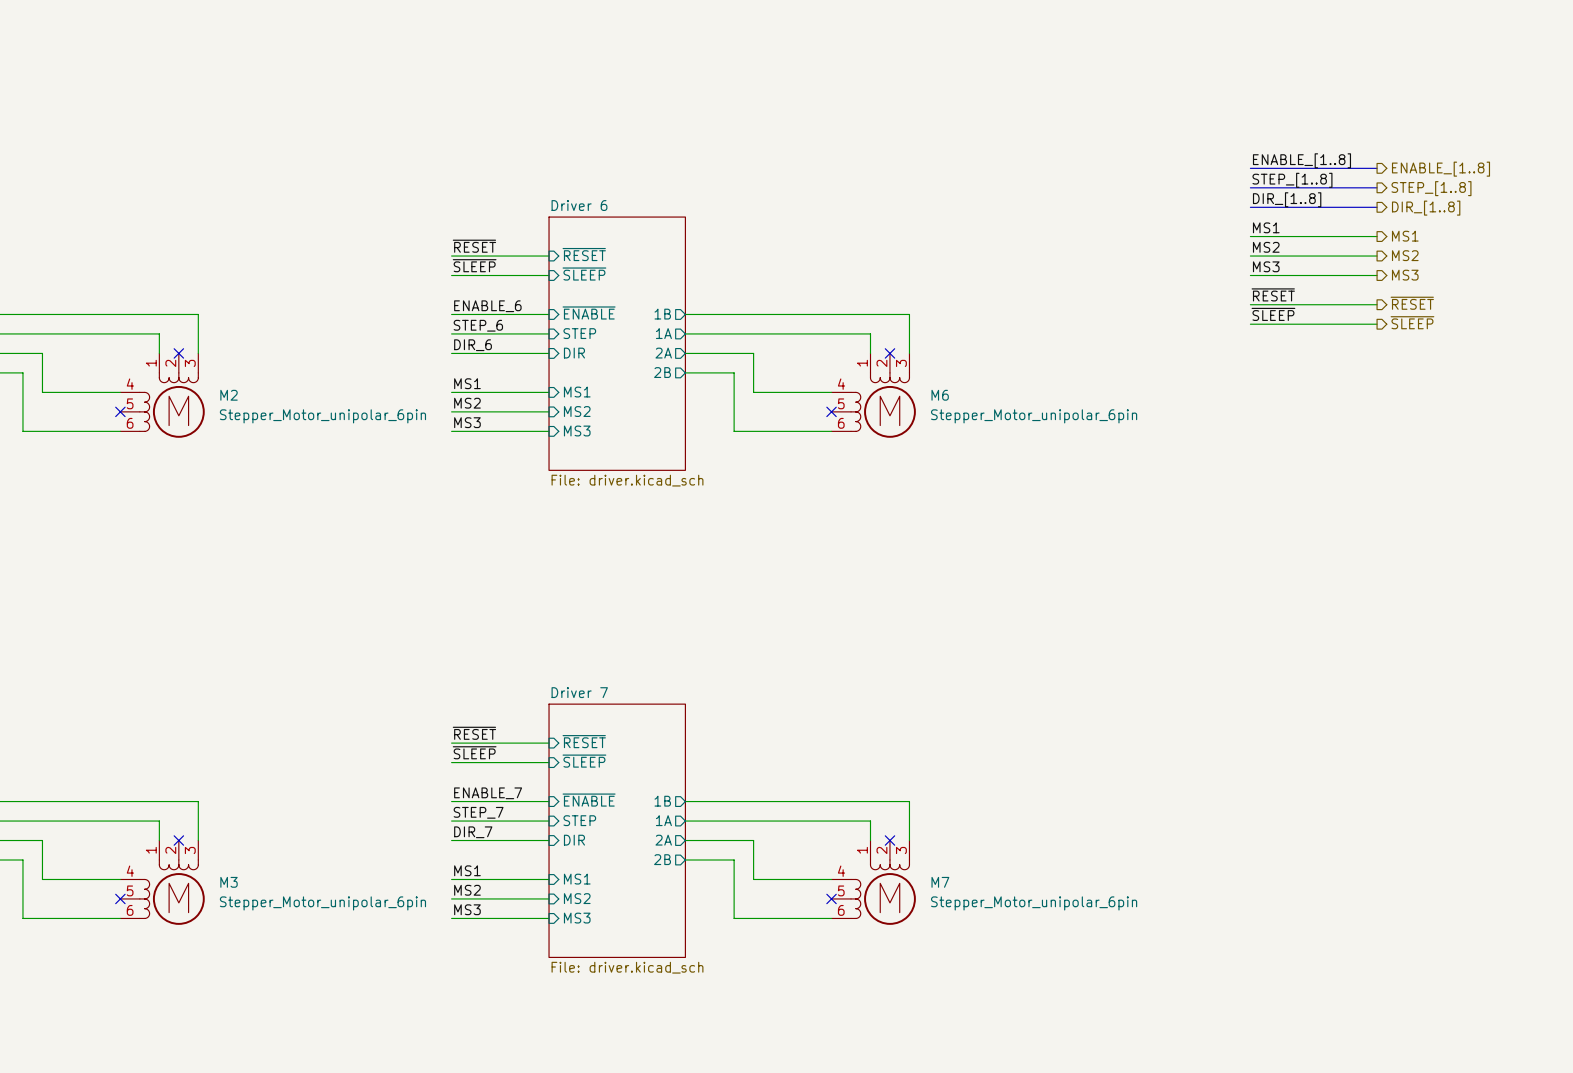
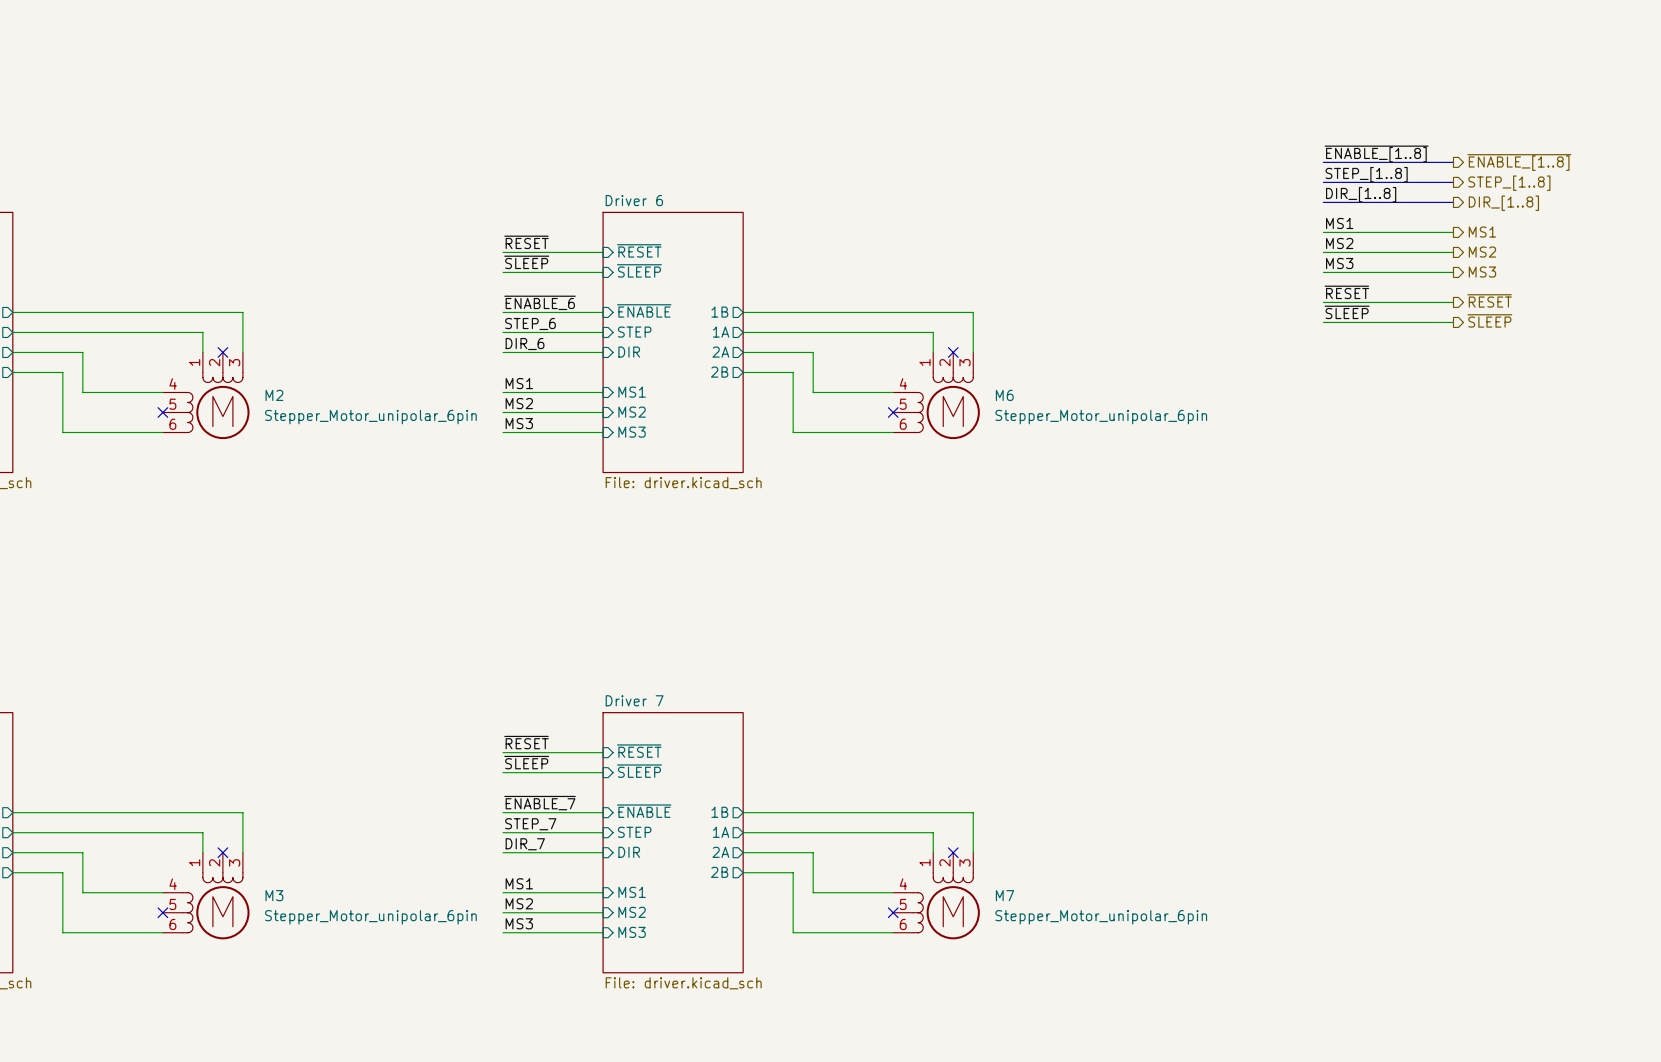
label: ENABLE_[1..8] (1301, 160) -> ~{ENABLE_[1..8]} (1376, 153)
hierarchical label: ENABLE_[1..8] (1440, 169) -> ~{ENABLE_[1..8]} (1519, 162)
label: ENABLE_6 (487, 306) -> ~{ENABLE_6} (540, 302)
label: ENABLE_7 (488, 793) -> ~{ENABLE_7} (540, 803)

